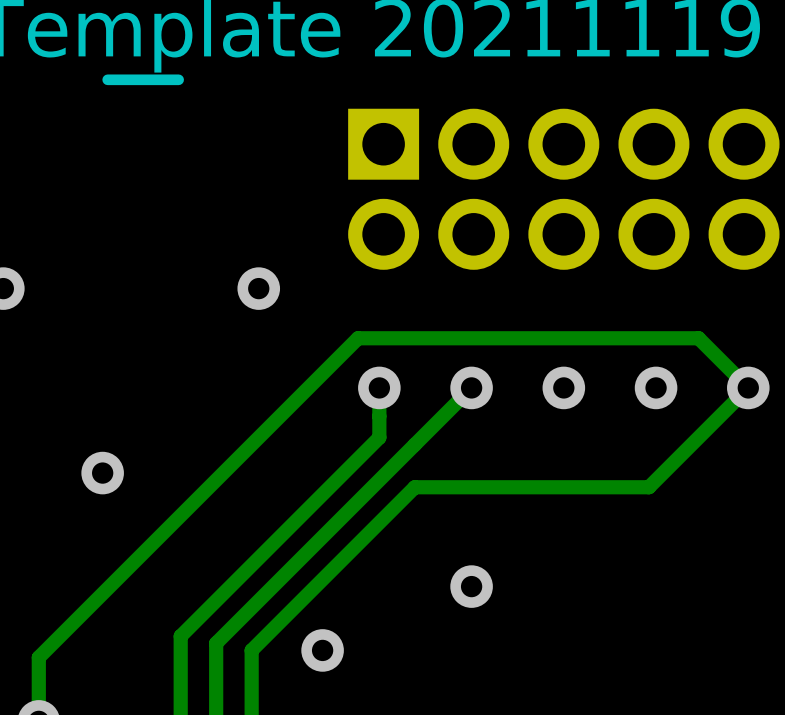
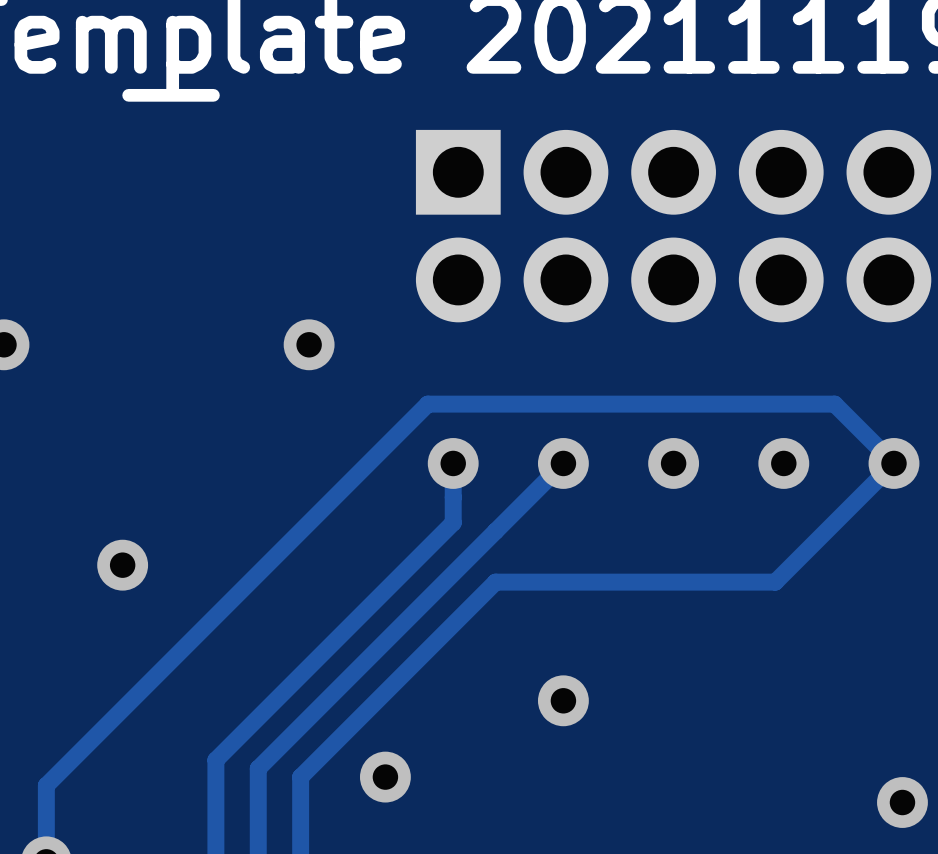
via: none -> (902, 802)

